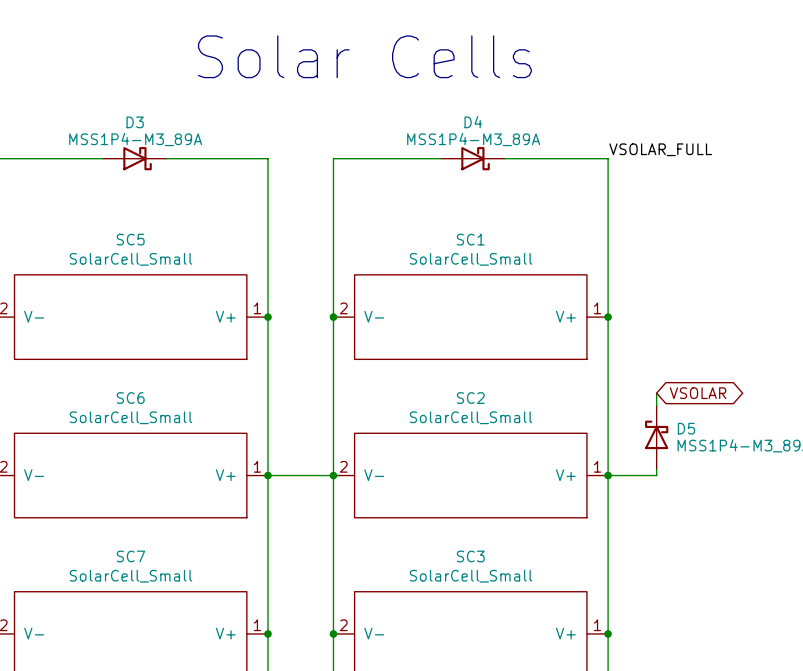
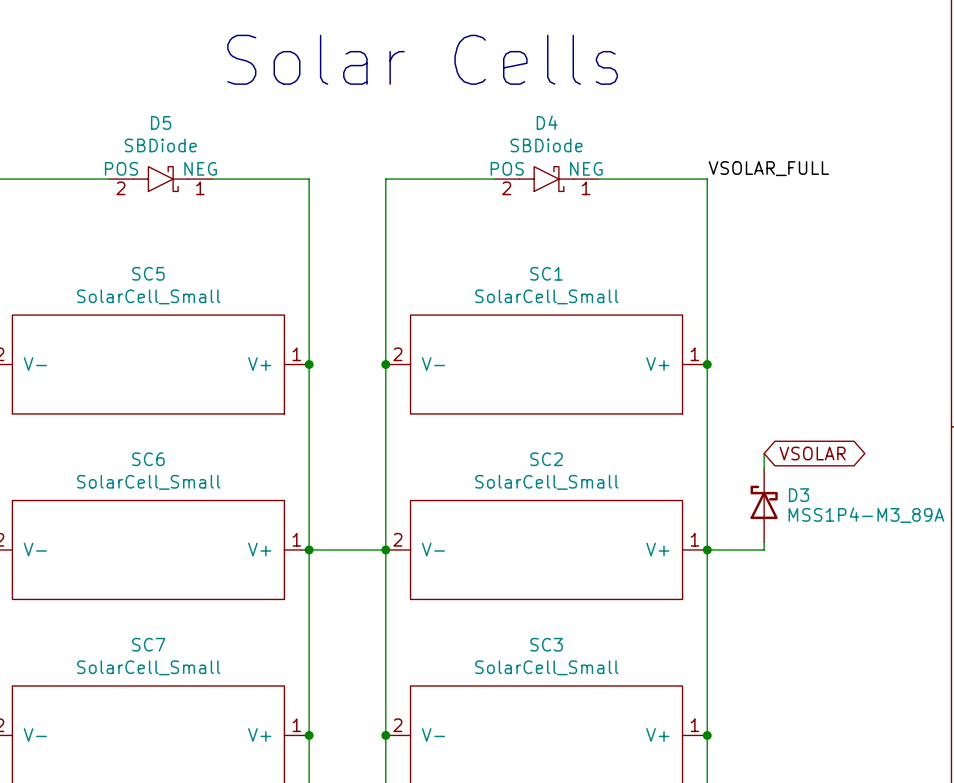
D4 value: MSS1P4-M3_89A (473, 139) -> SBDiode (546, 145)
D4 symbol: [441, 147, 505, 171] -> [494, 166, 599, 192]
D3: MSS1P4-M3_89A (134, 158) -> none
D5: none -> SBDiode (160, 179)
D5 name: D5 (686, 428) -> D3 (799, 495)

